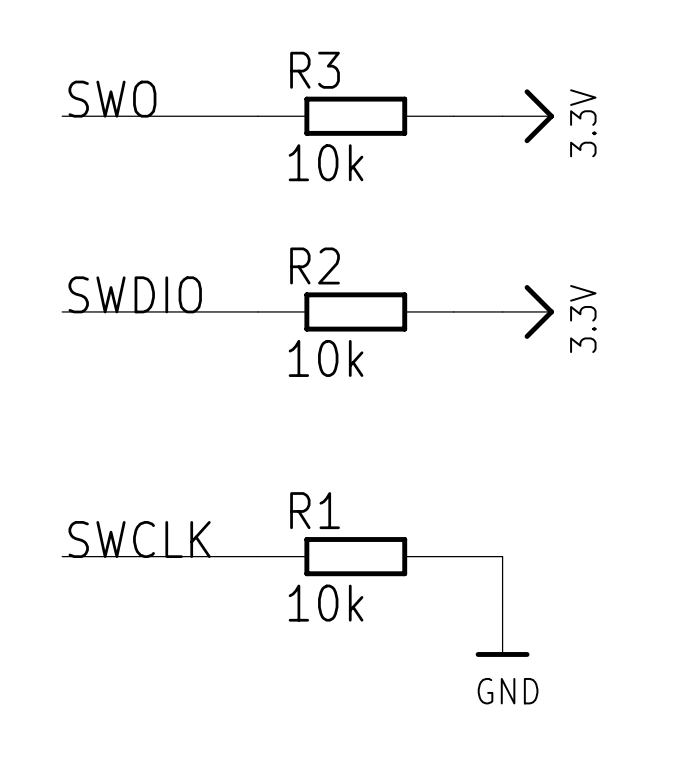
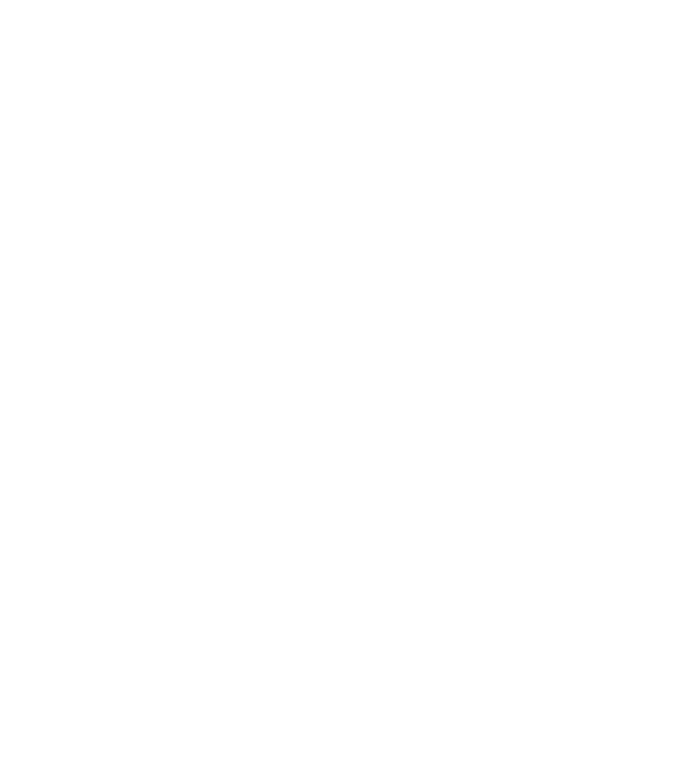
label: SWO (112, 99) -> none
wire: (62, 116) (257, 116) -> none
R3: 10k (355, 116) -> none
wire: (453, 116) (502, 116) -> none
power symbol: 3.3V (528, 116) -> none
label: SWDIO (135, 294) -> none
wire: (62, 311) (257, 311) -> none
R2: 10k (355, 311) -> none
wire: (453, 311) (502, 311) -> none
power symbol: 3.3V (528, 311) -> none
label: SWCLK (139, 539) -> none
wire: (62, 556) (257, 556) -> none
R1: 10k (355, 556) -> none
wire: (453, 556) (502, 556) (502, 605) -> none
power symbol: GND (502, 631) -> none

